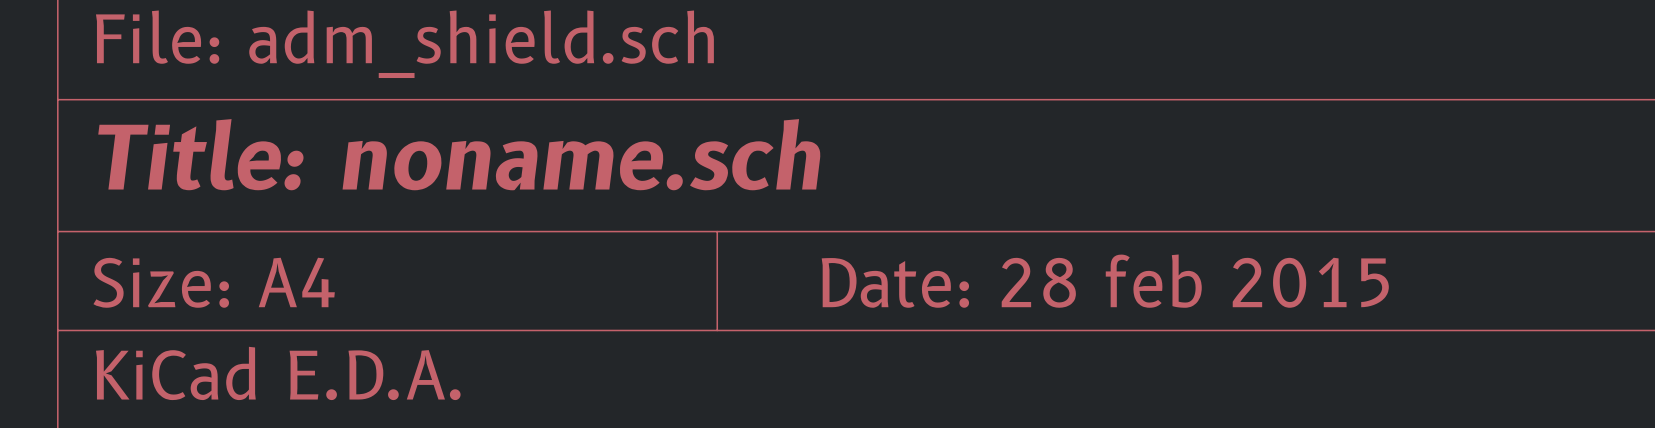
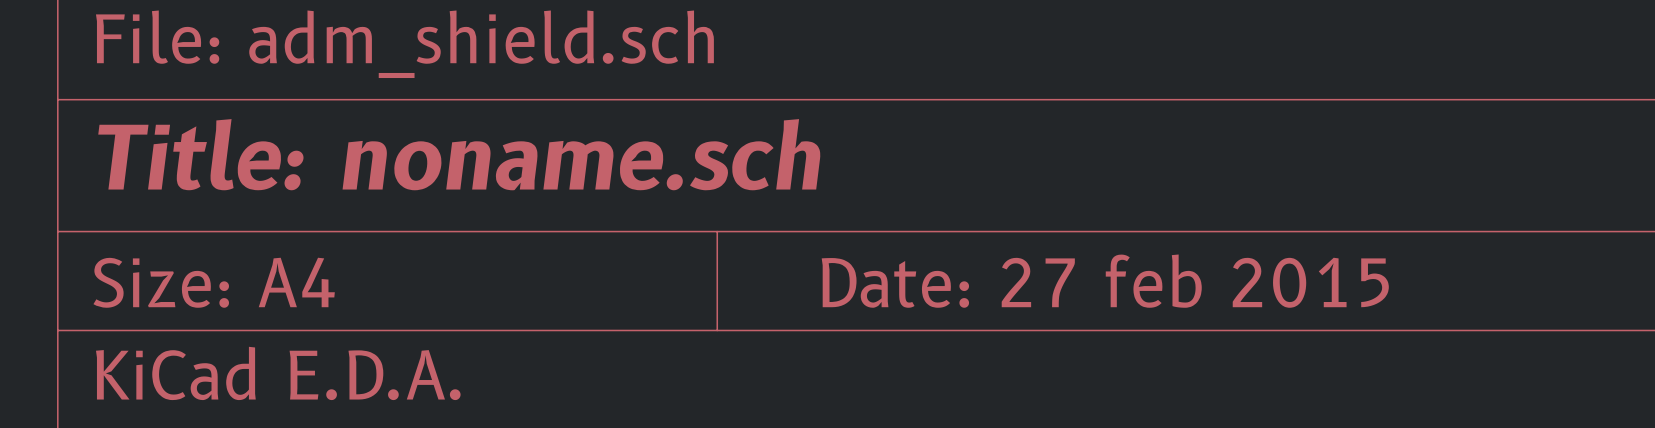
title block: Date: 28 feb 2015 (1105, 281) -> Date: 27 feb 2015 (1105, 281)

